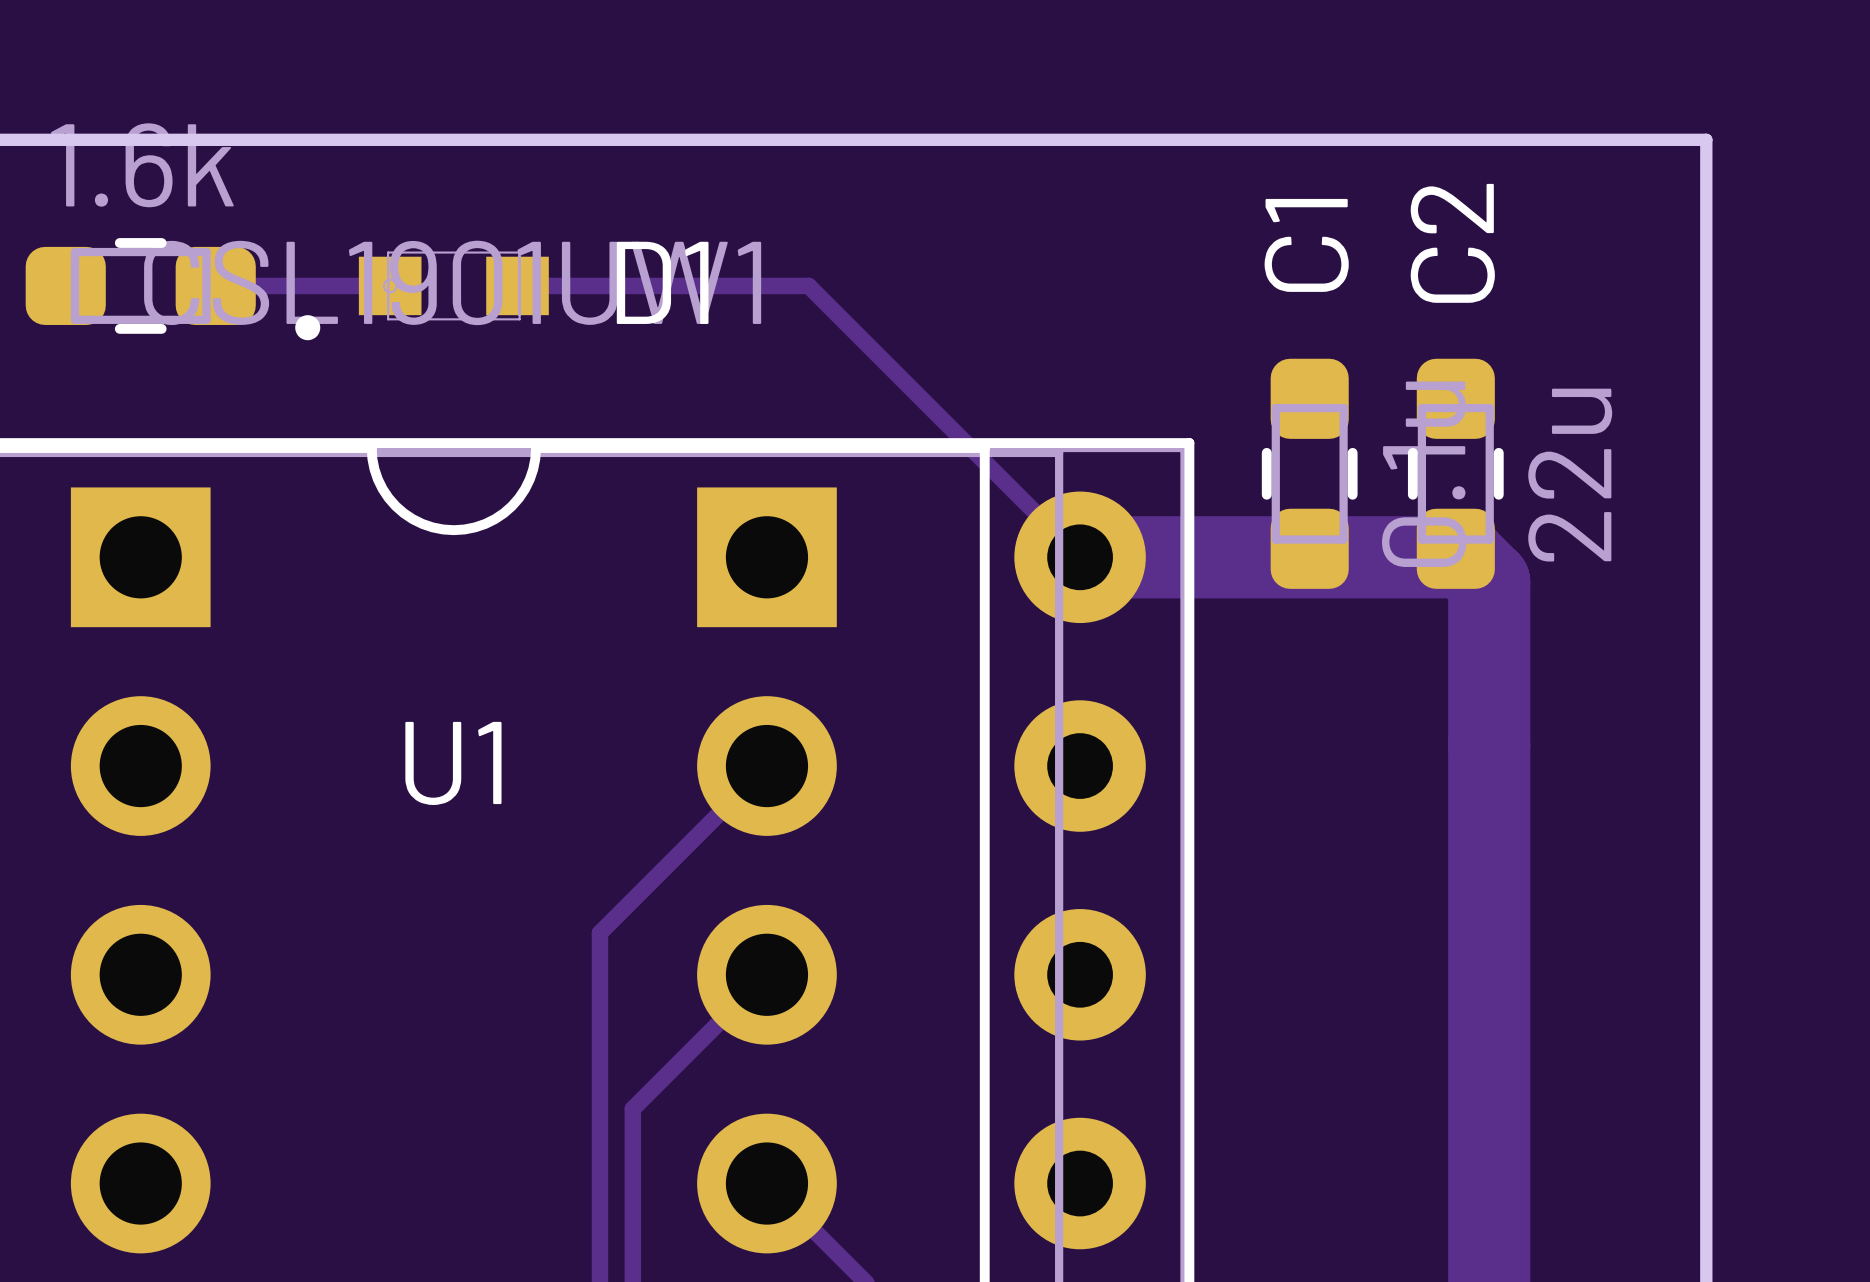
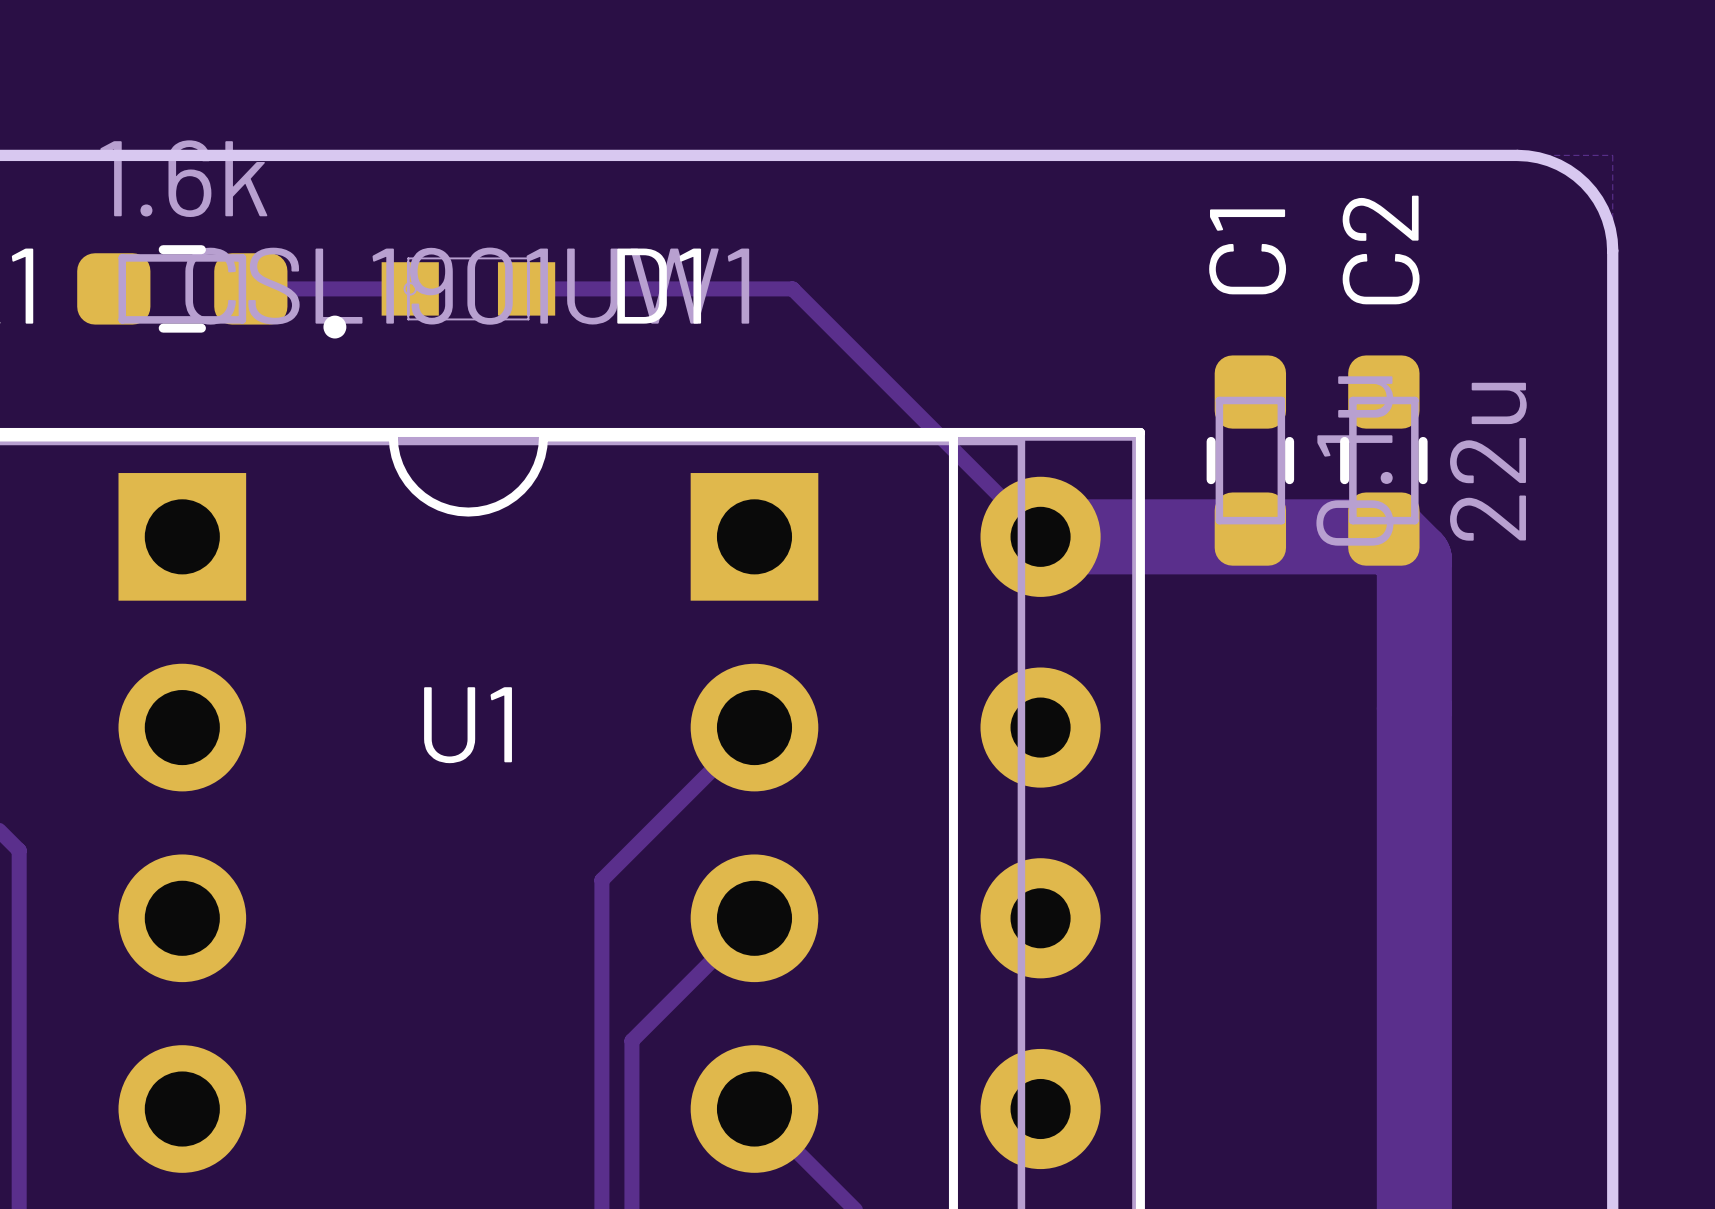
board edge: (1601, 139) (1706, 139) (1706, 244) -> (1517, 155) (1538, 157) (1558, 164) (1584, 183) (1603, 209) (1610, 229) (1612, 250)

